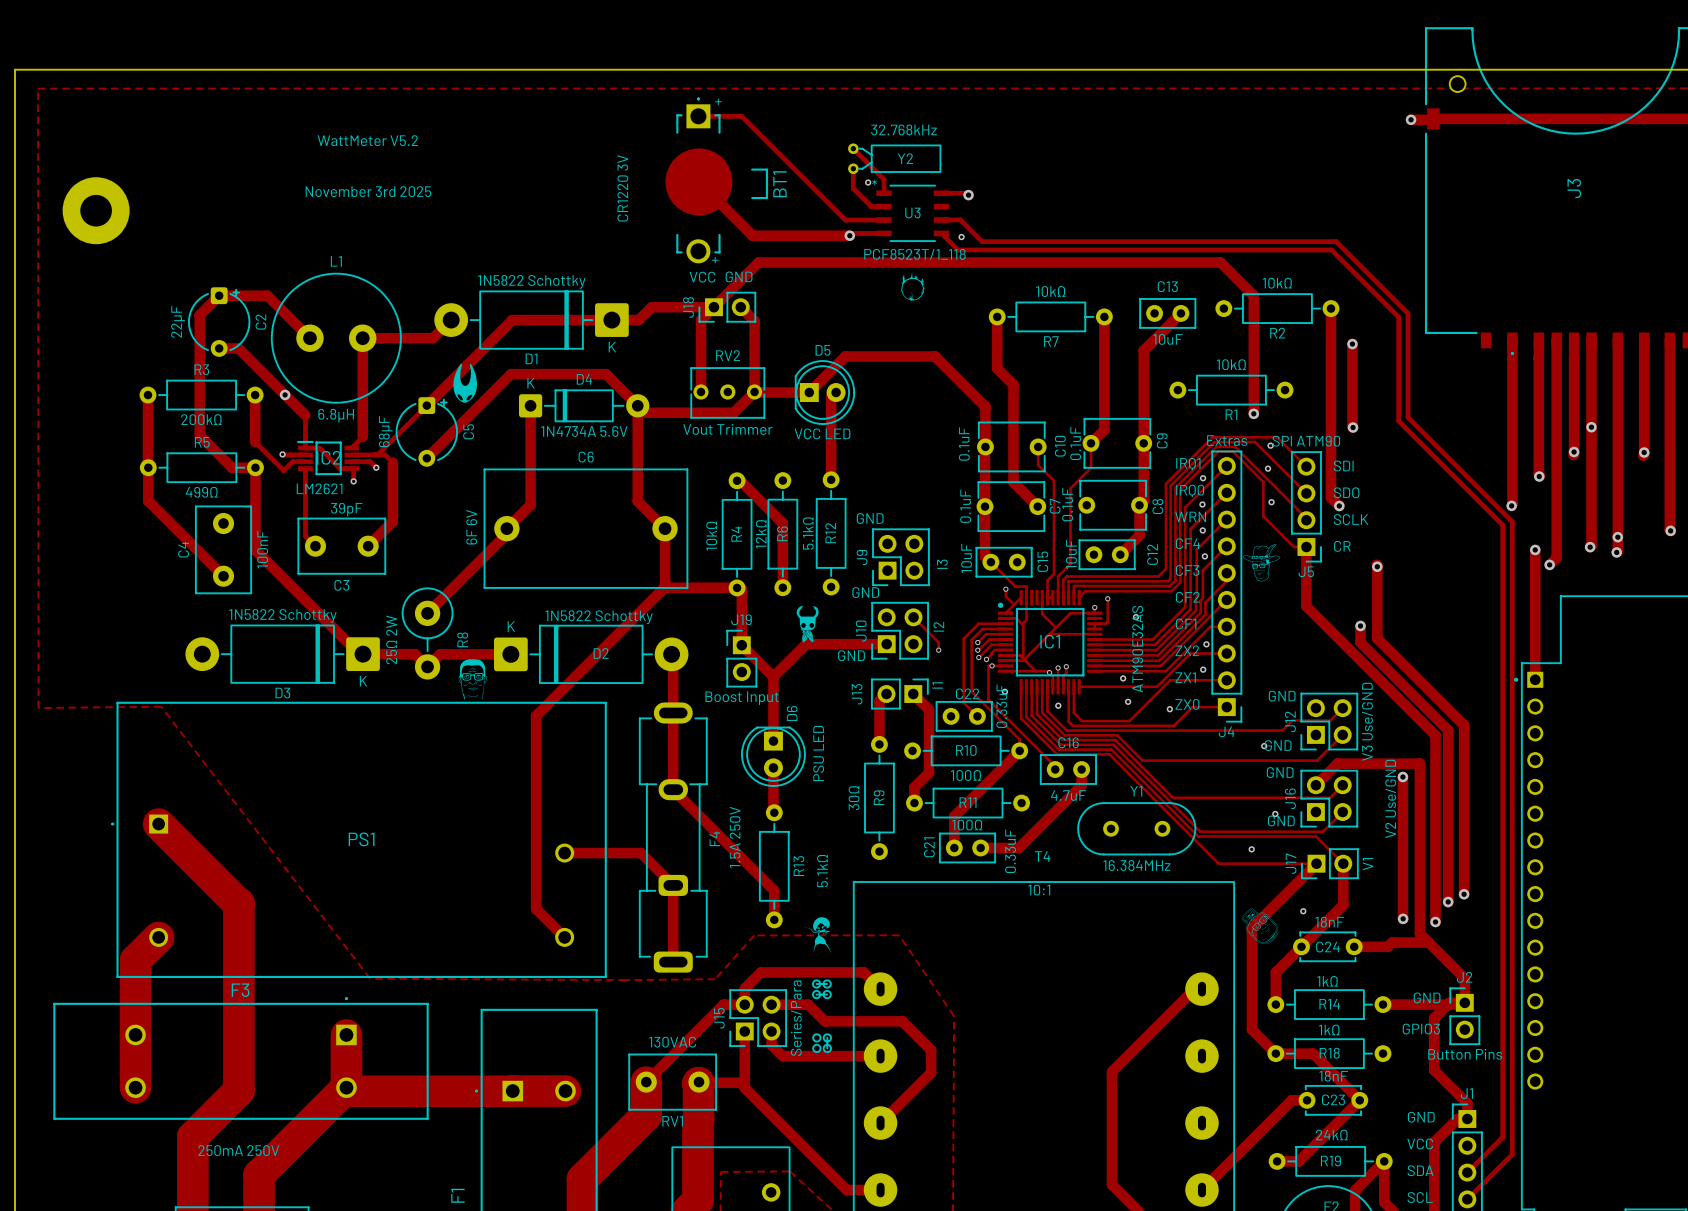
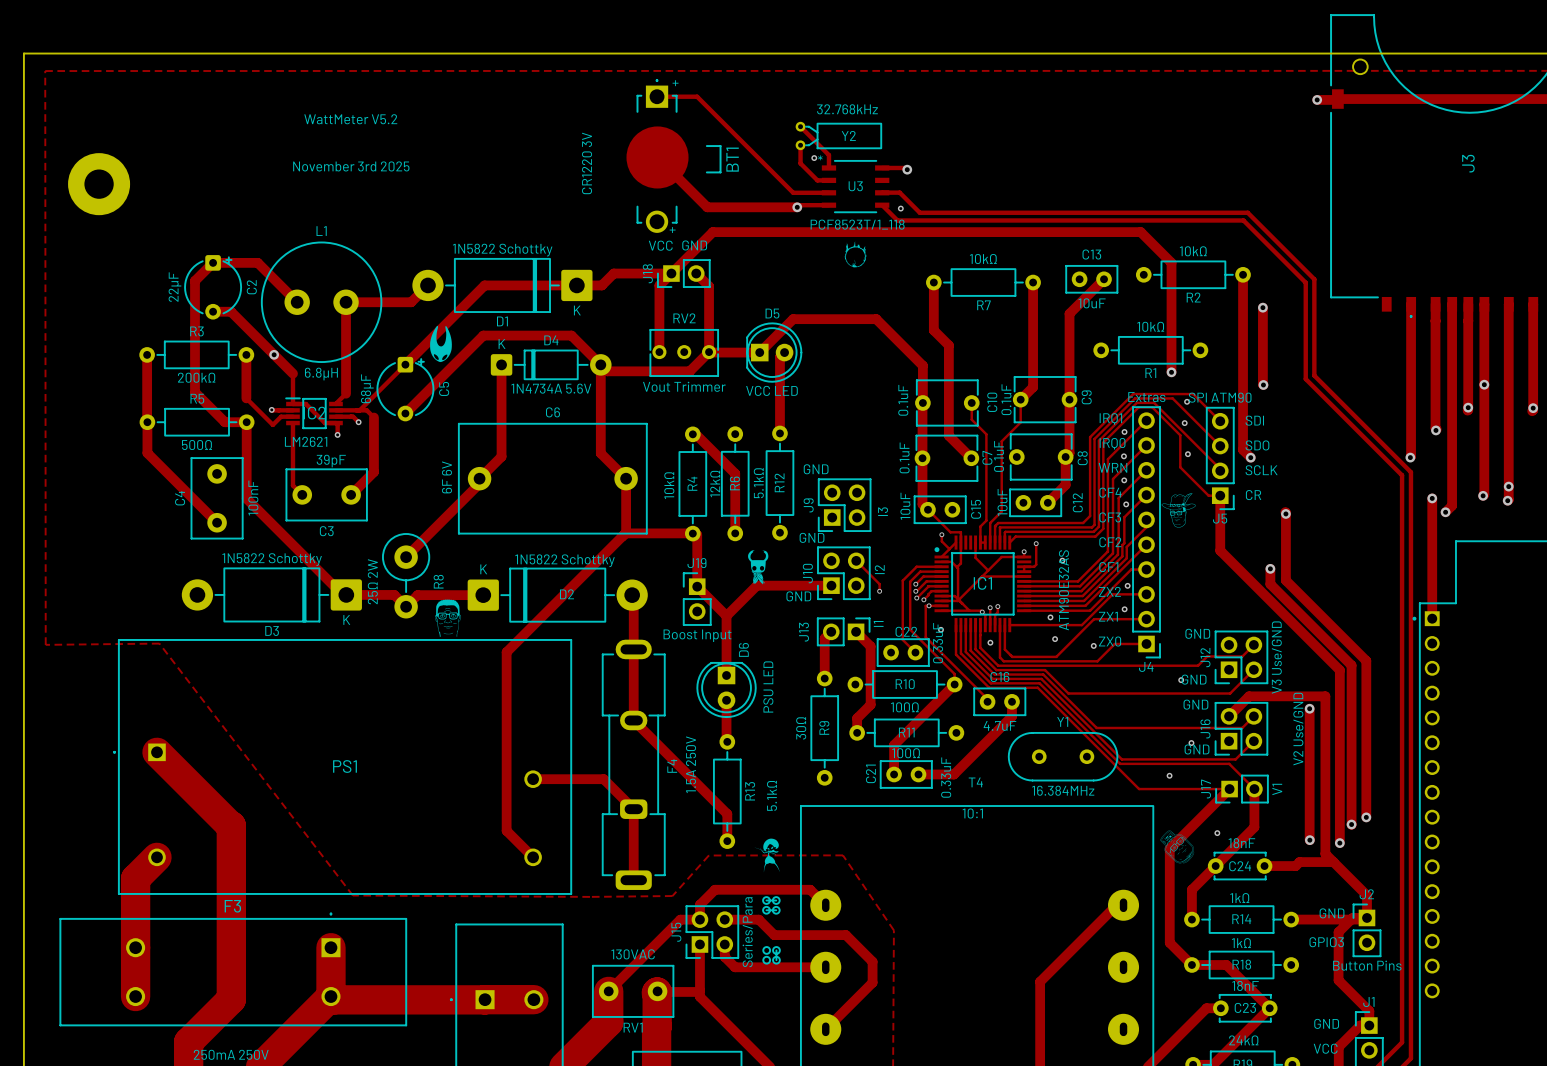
R5 value: 499Ω (201, 492) -> 500Ω (197, 445)

